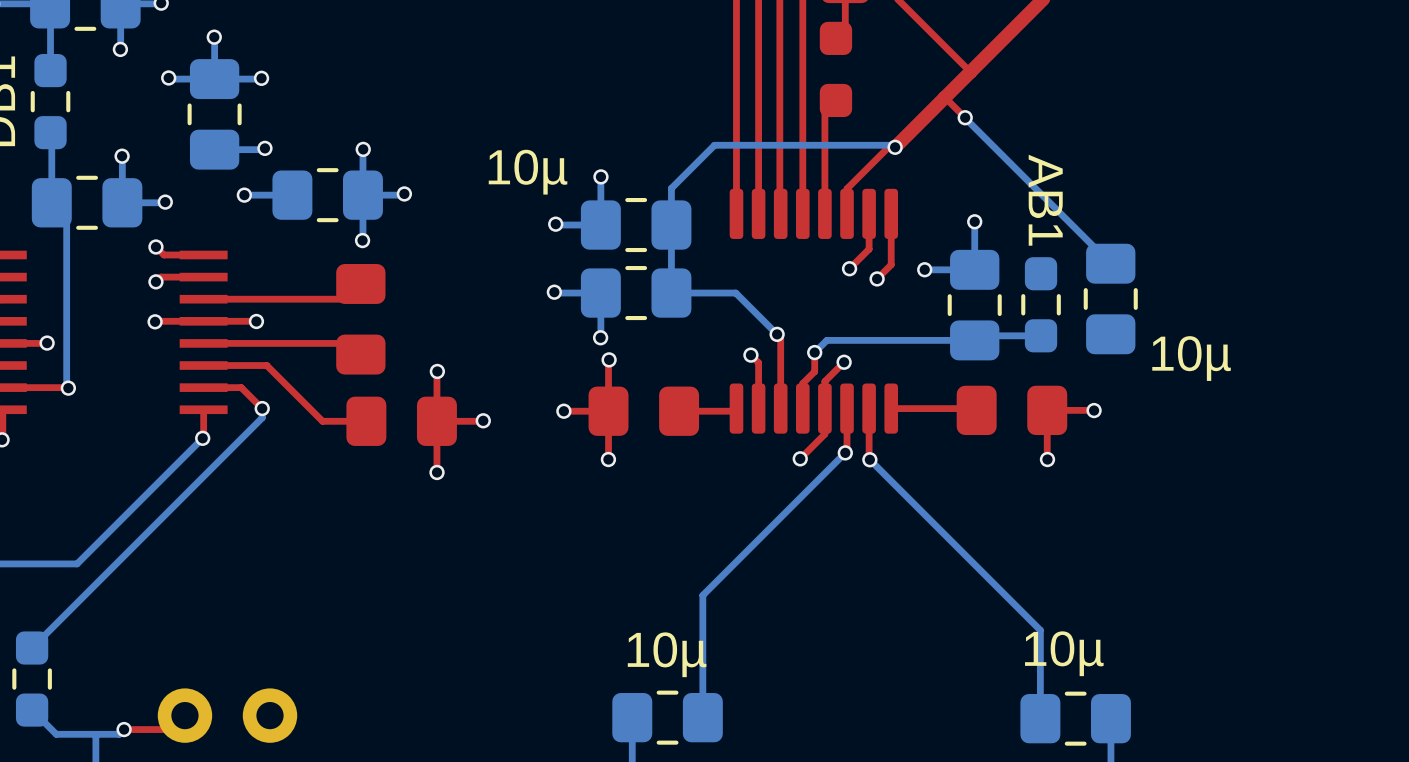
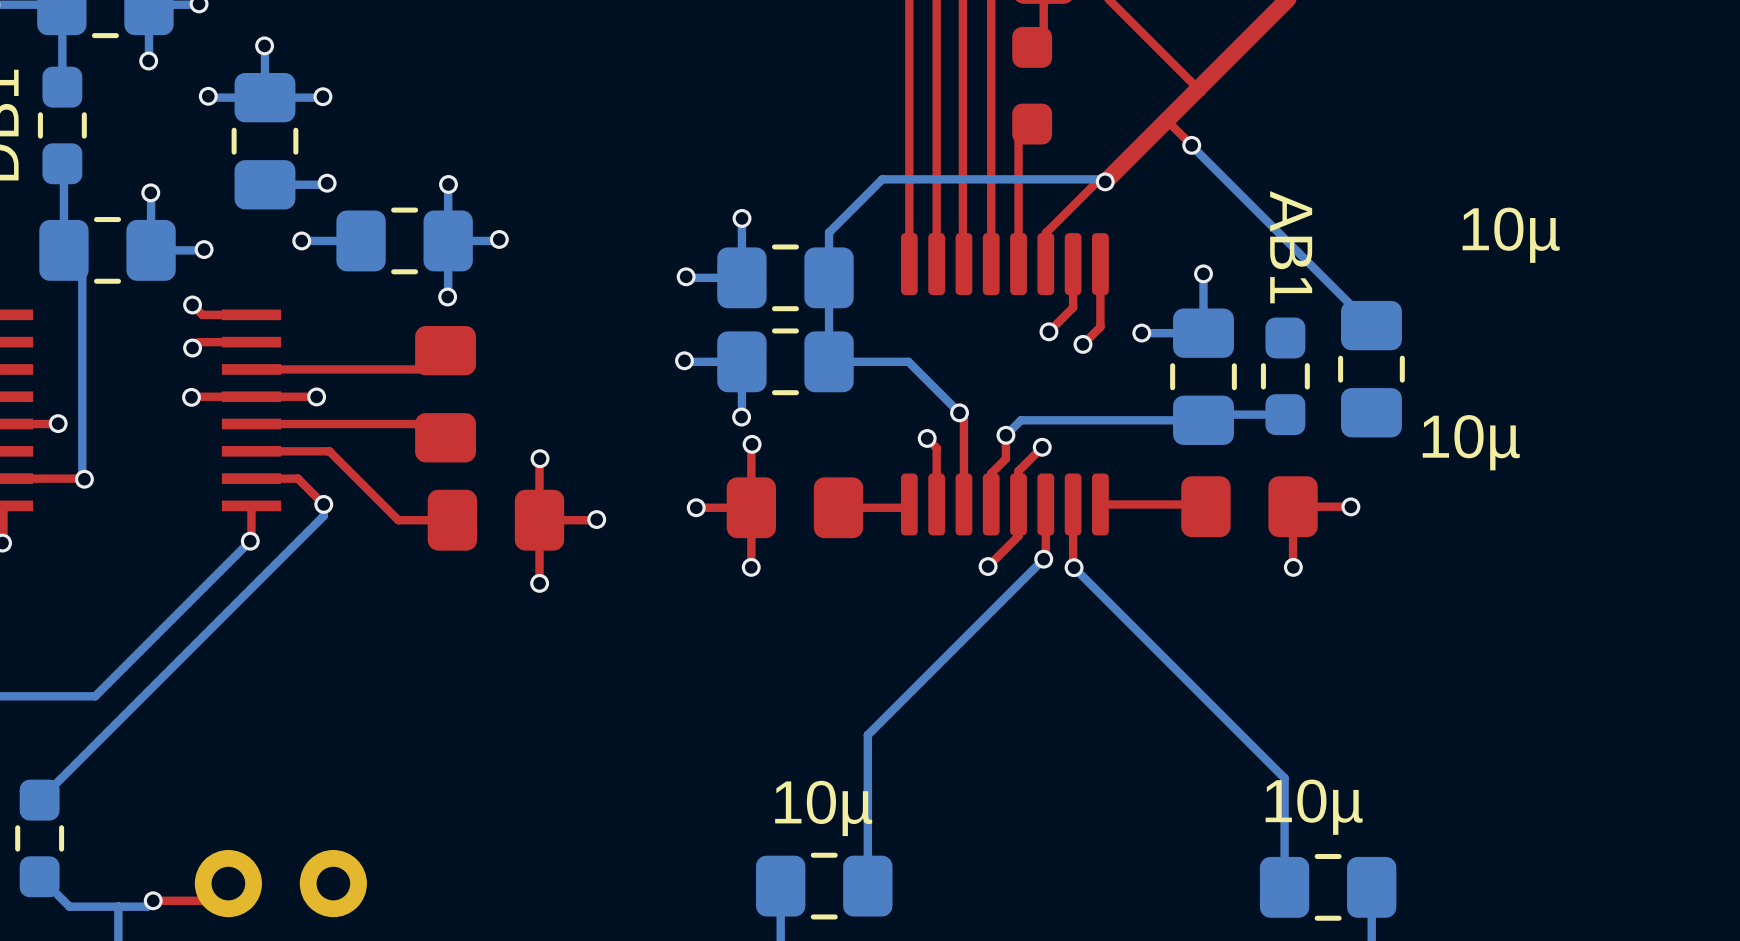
text position: 10µ (528, 172) -> 10µ (1511, 235)

